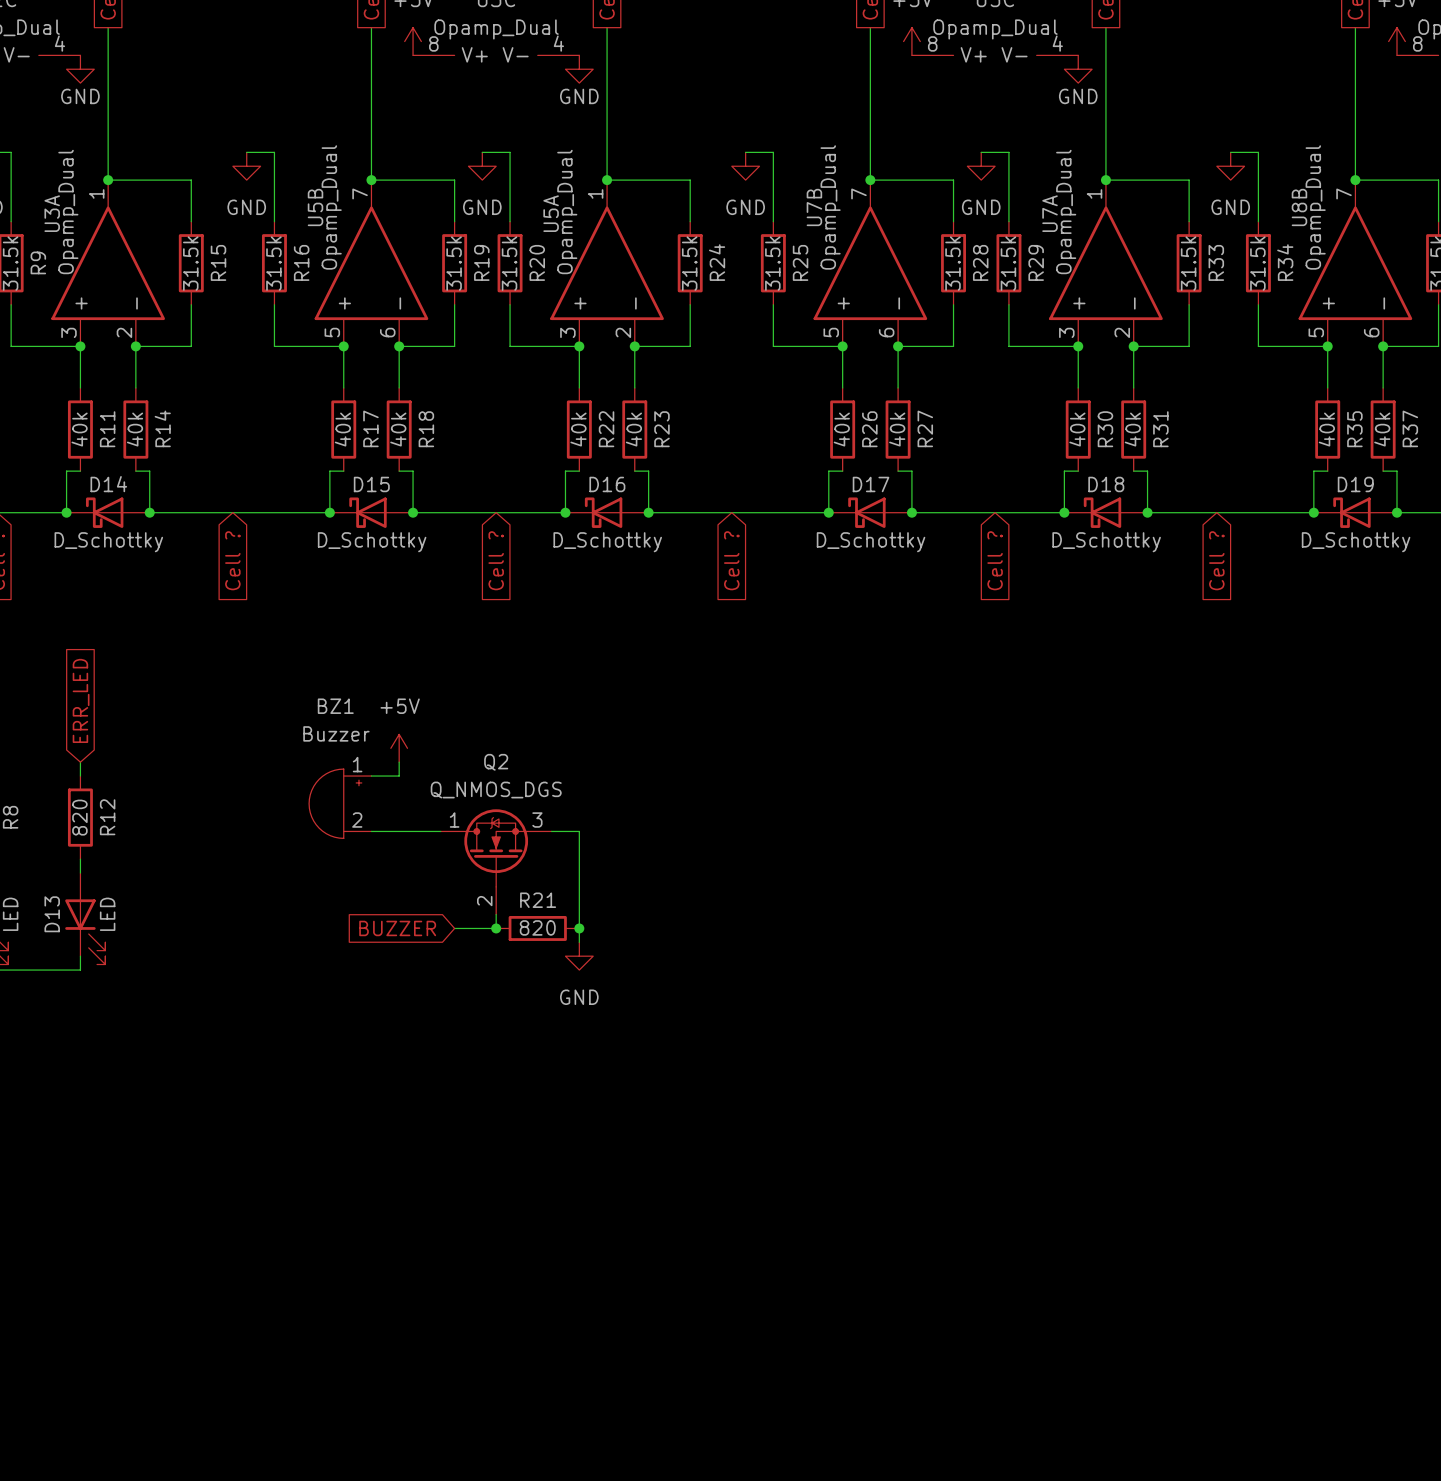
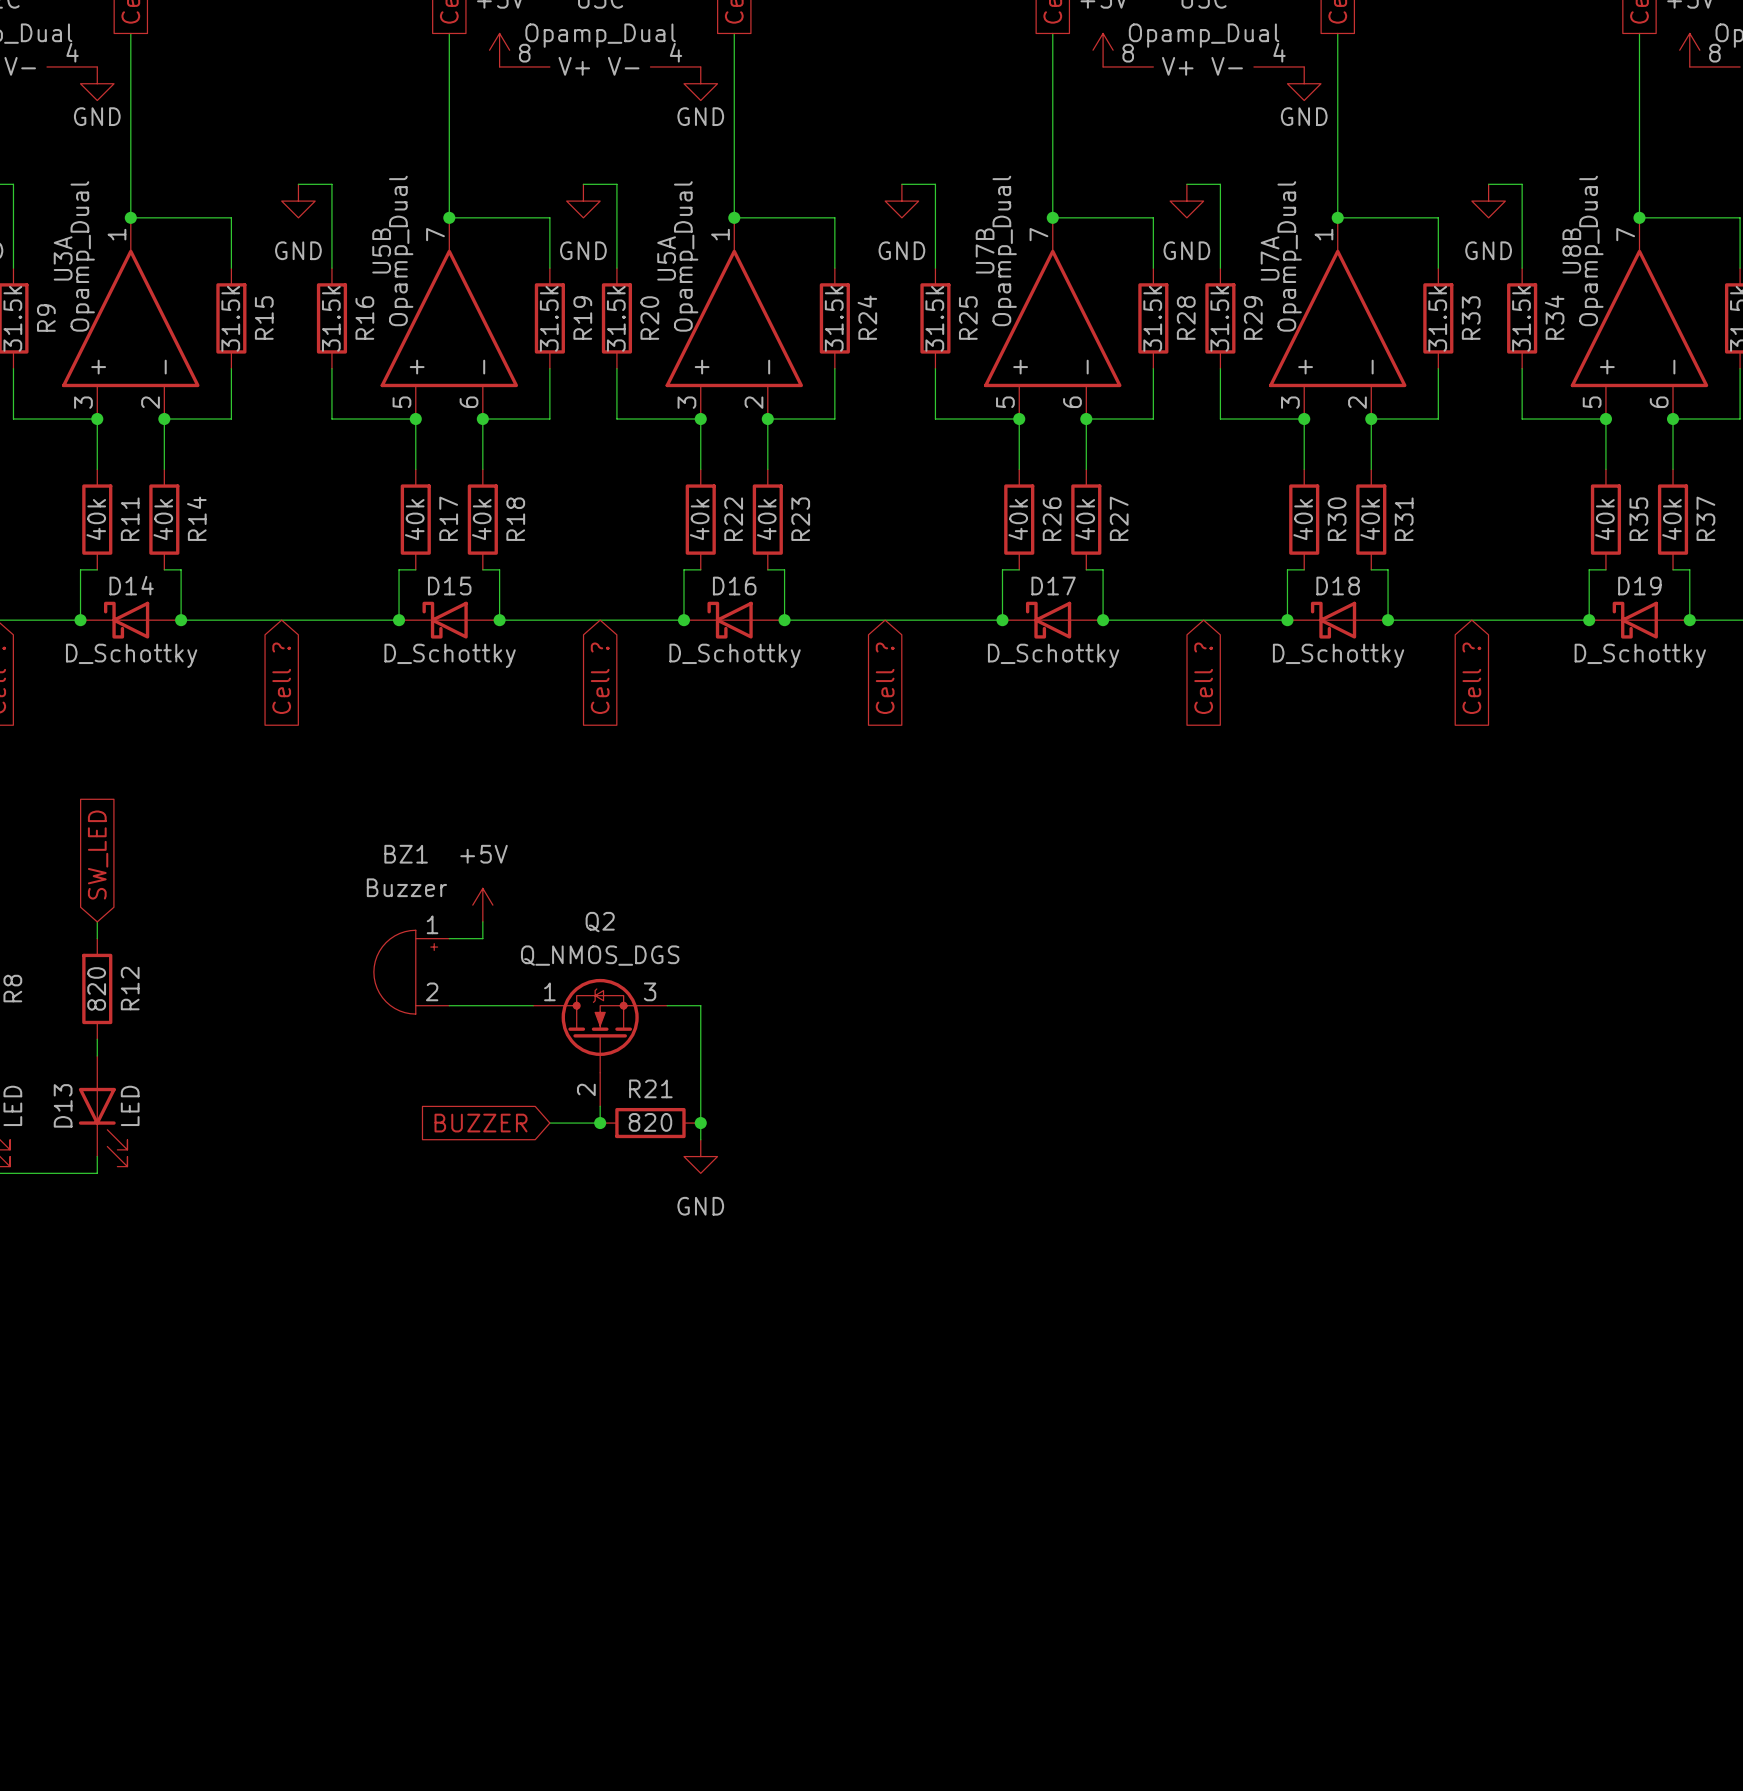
global label: ERR_LED (81, 700) -> SW_LED (98, 855)

